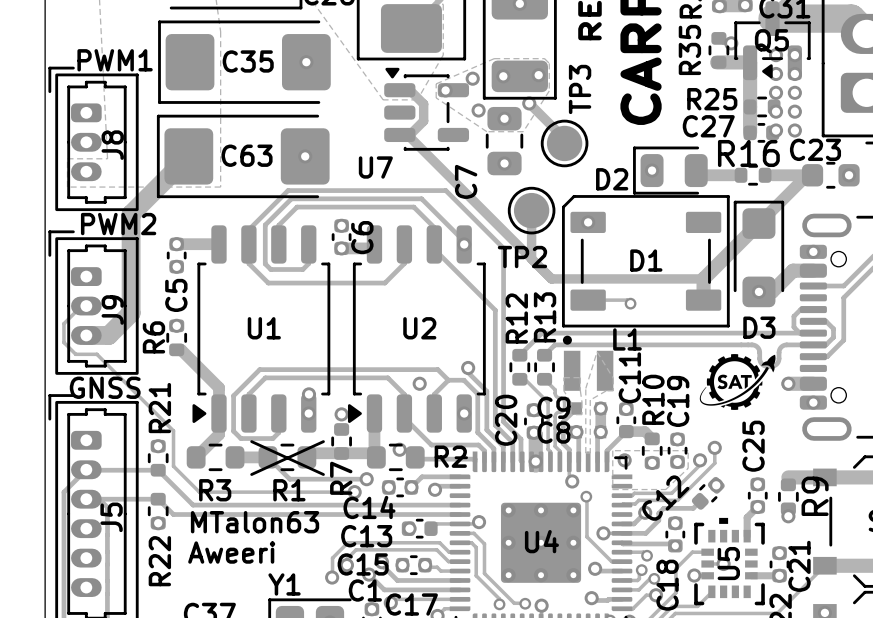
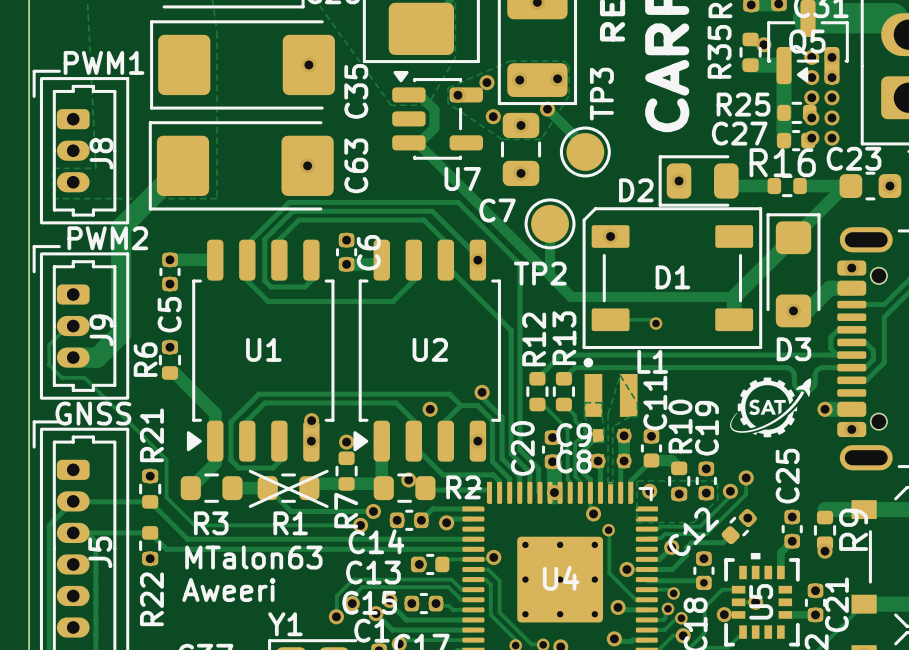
C35 name rotation: 0° (248, 61) -> 90° counterclockwise (356, 91)
C35 name position: C35 (248, 61) -> C35 (356, 91)
C63 name rotation: 0° (247, 155) -> 90° counterclockwise (356, 165)
C63 name position: C63 (247, 155) -> C63 (356, 165)
U7 name position: U7 (375, 167) -> U7 (462, 178)
C7 name rotation: 0° (466, 181) -> 90° clockwise (497, 210)

